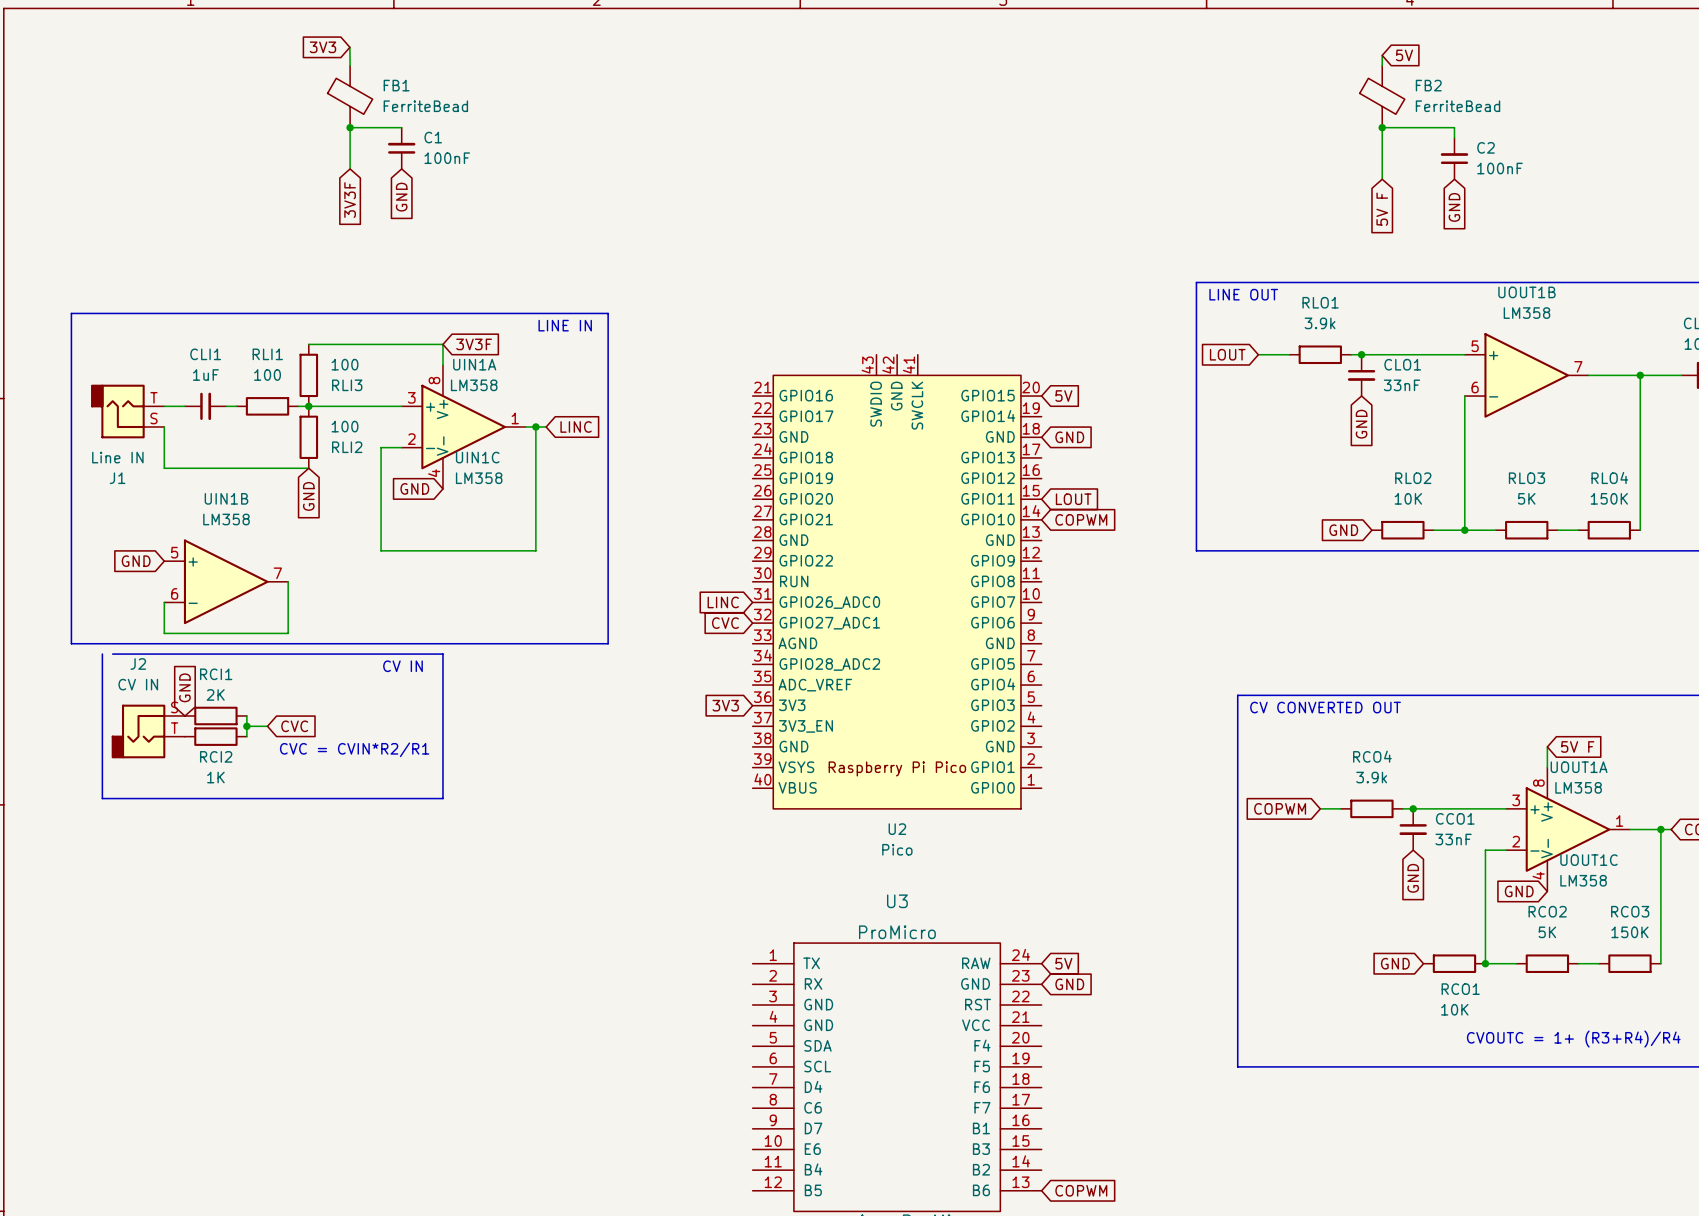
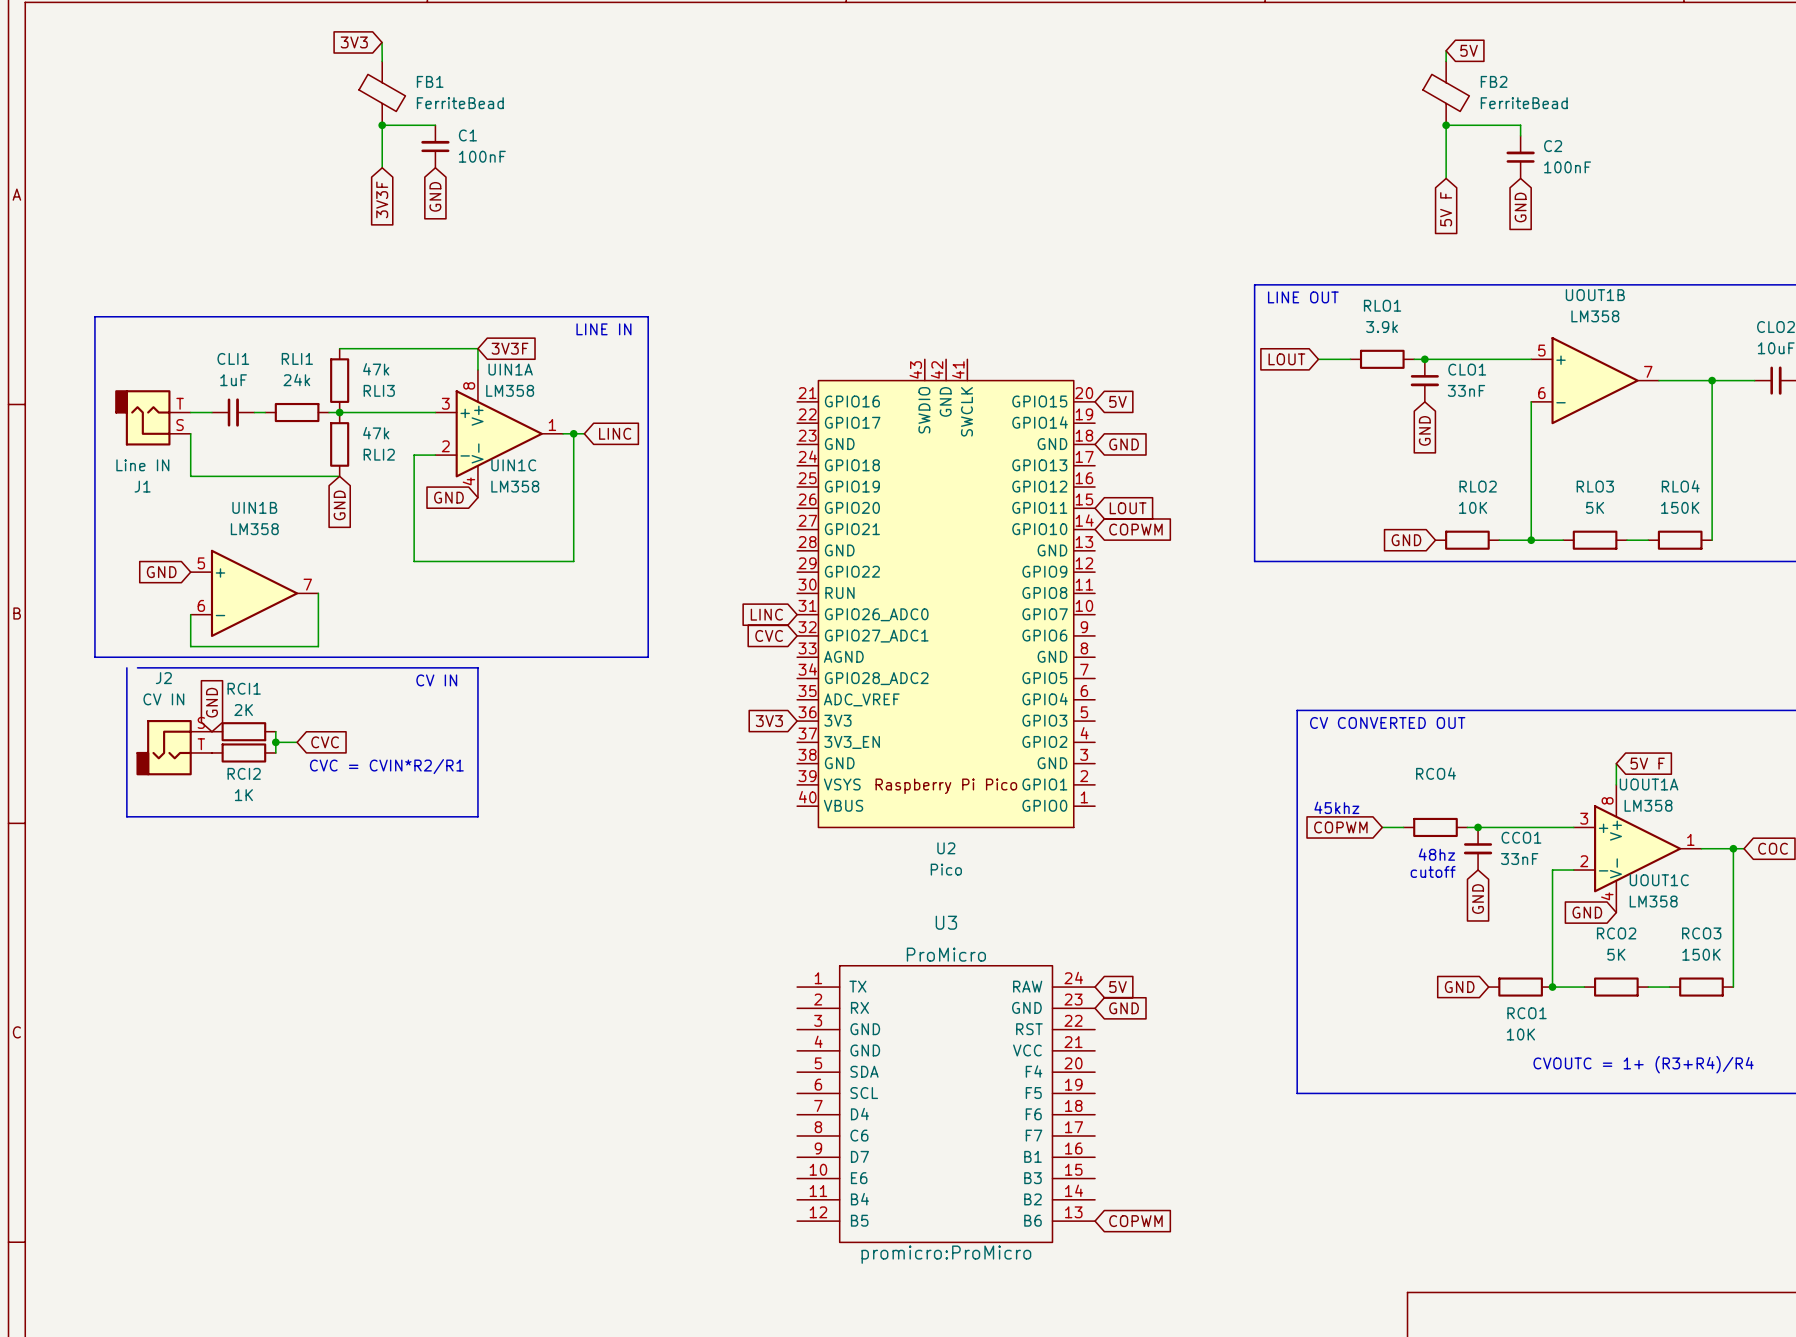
RLI3 value: 100 (345, 364) -> 47k (376, 369)
RLI1 value: 100 (267, 375) -> 24k (296, 379)
RLI2 value: 100 (345, 426) -> 47k (376, 433)
RCO4 value: 3.9k (1371, 777) -> none
text: none -> 45khz (1336, 807)
text: none -> 48hz (1436, 854)
text: none -> cutoff (1433, 871)

